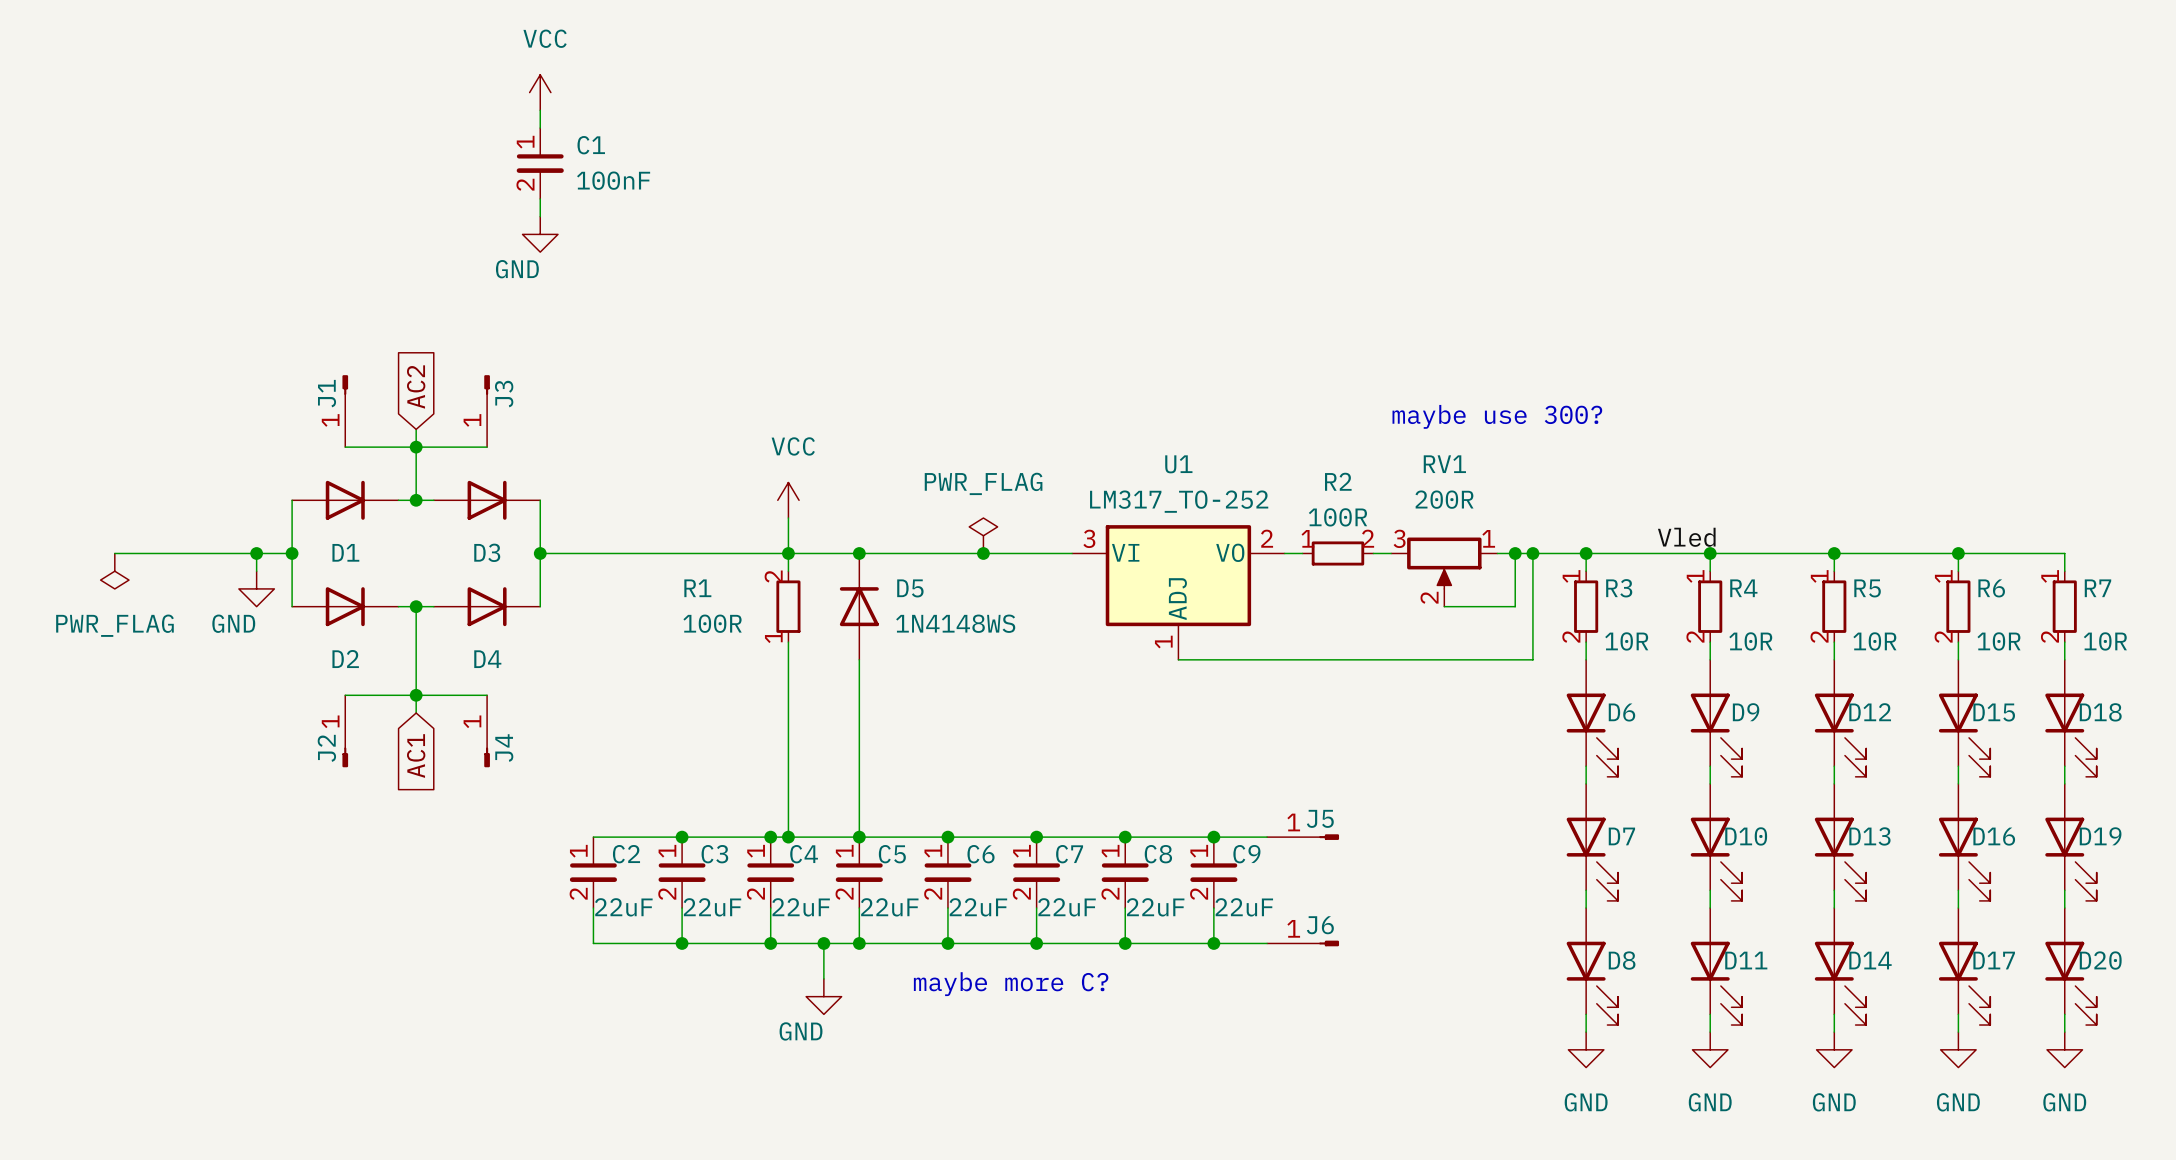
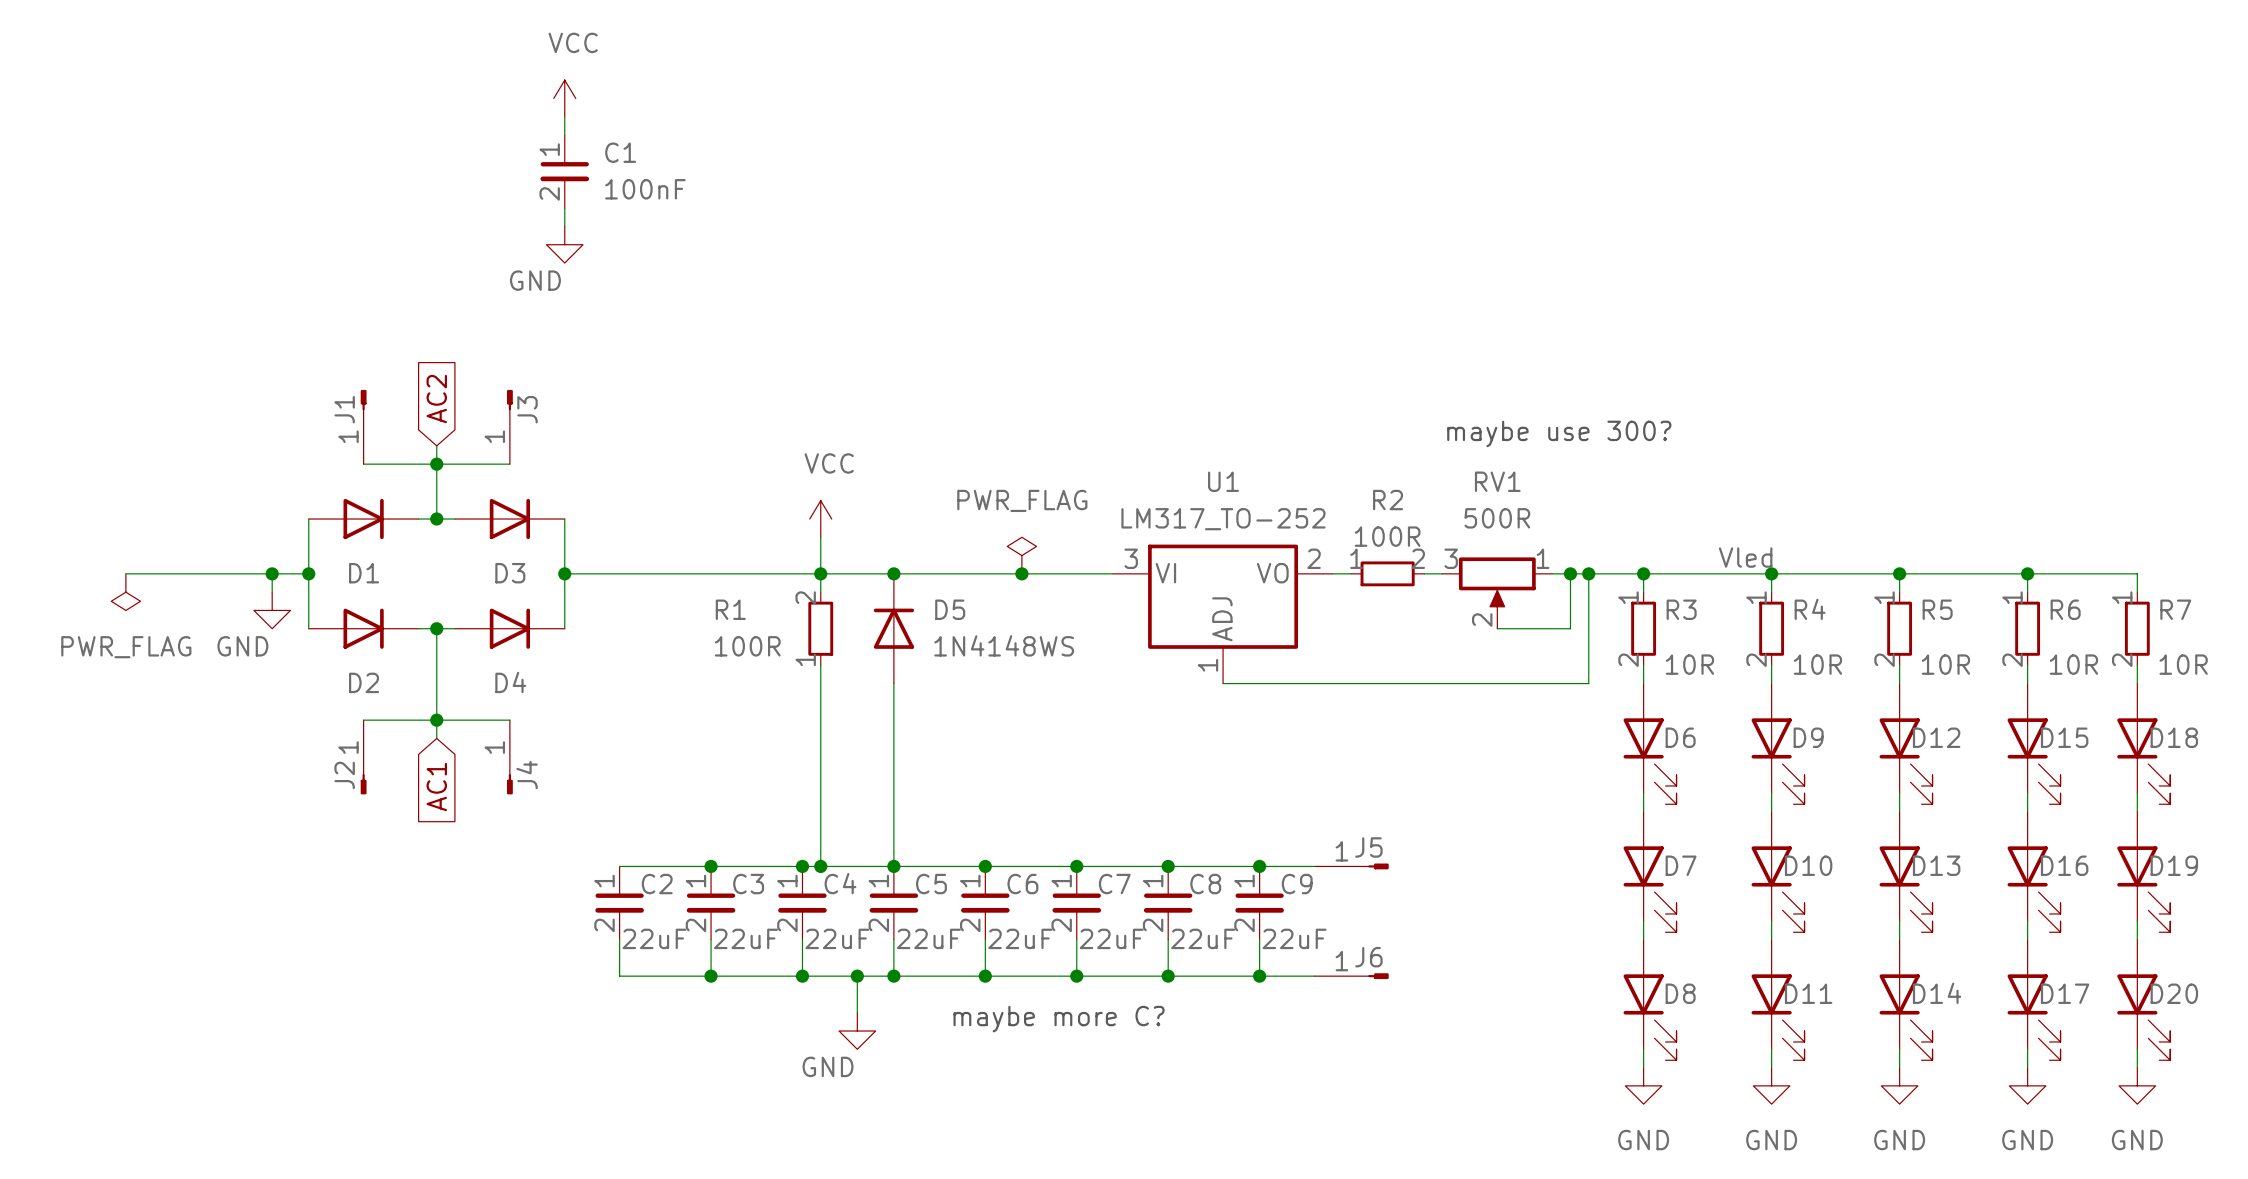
RV1 value: 200R (1444, 499) -> 500R (1497, 518)

